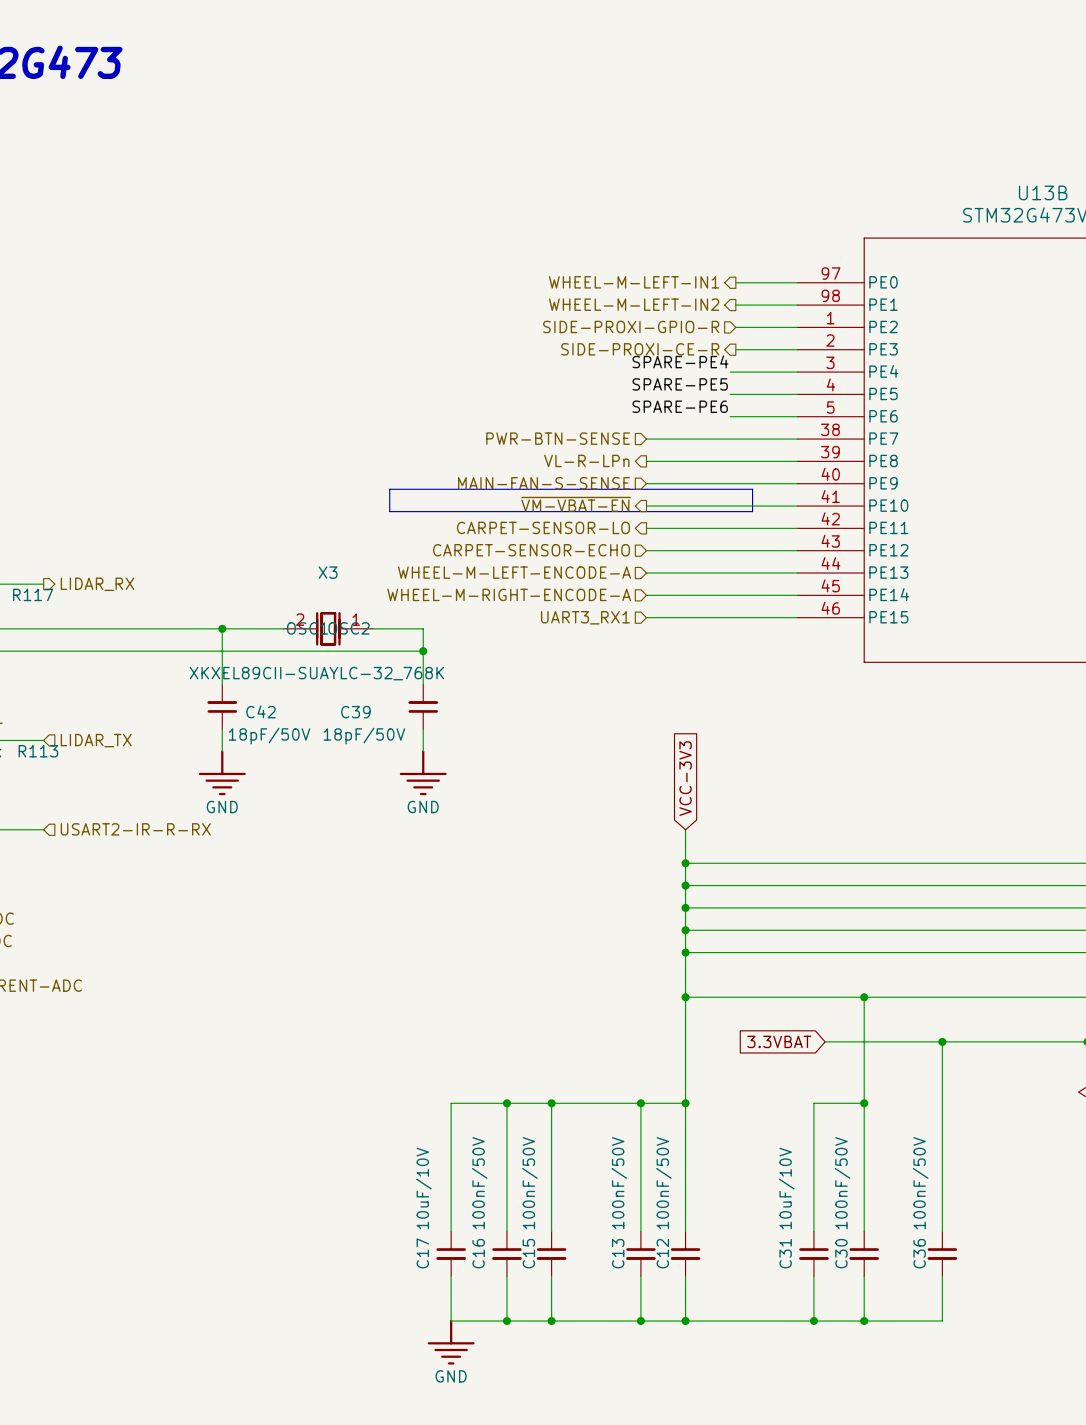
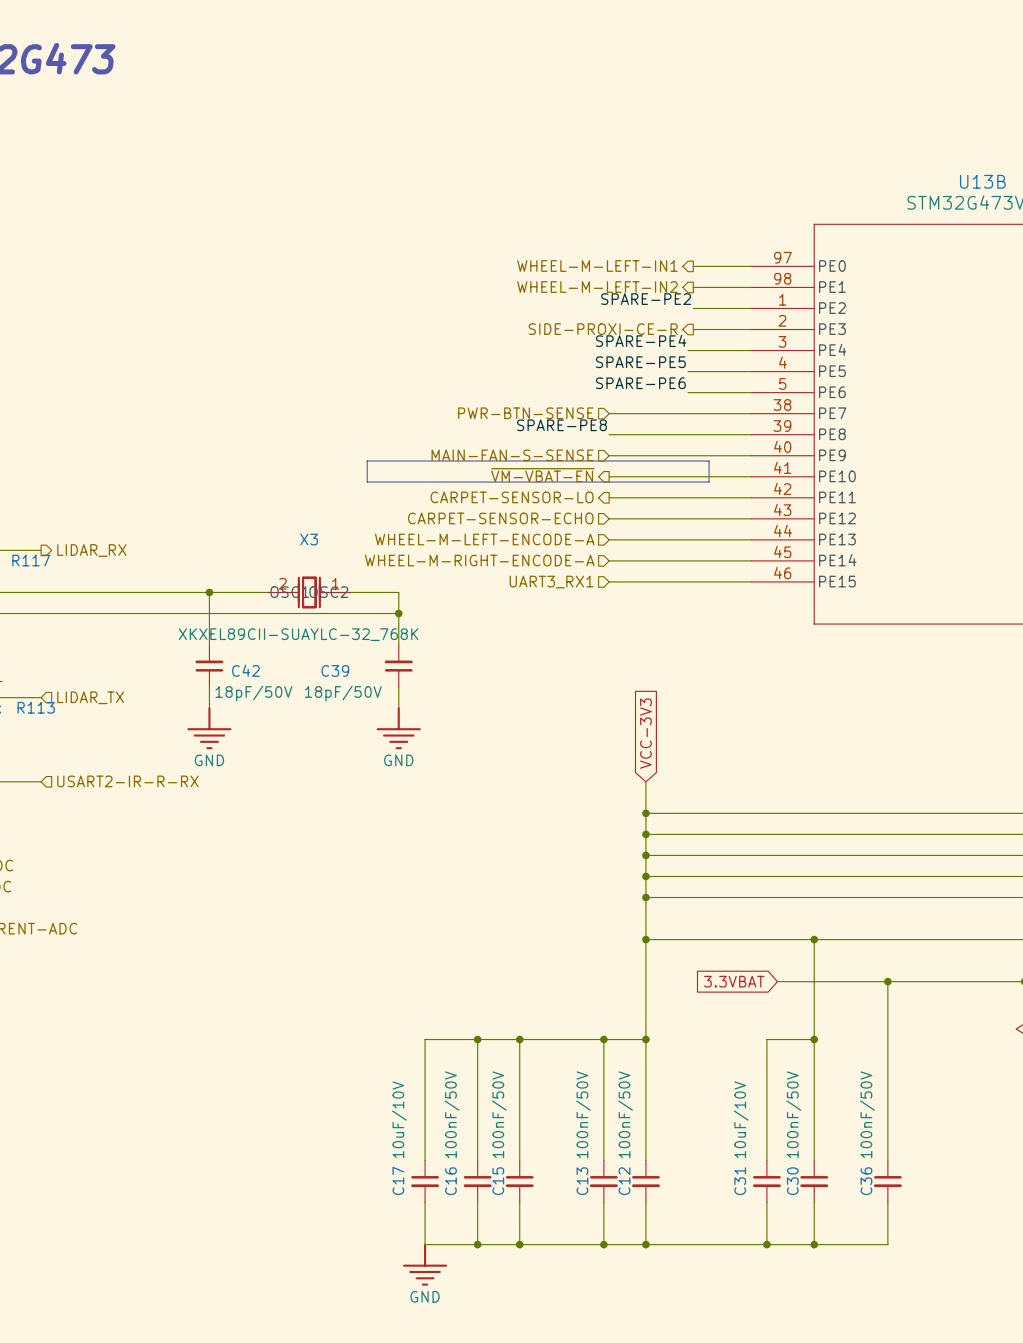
label: none -> SPARE-PE2 (646, 299)
hierarchical label: SIDE-PROXI-GPIO-R (631, 326) -> none
label: none -> SPARE-PE8 (561, 425)
hierarchical label: VL-R-LPn (586, 460) -> none

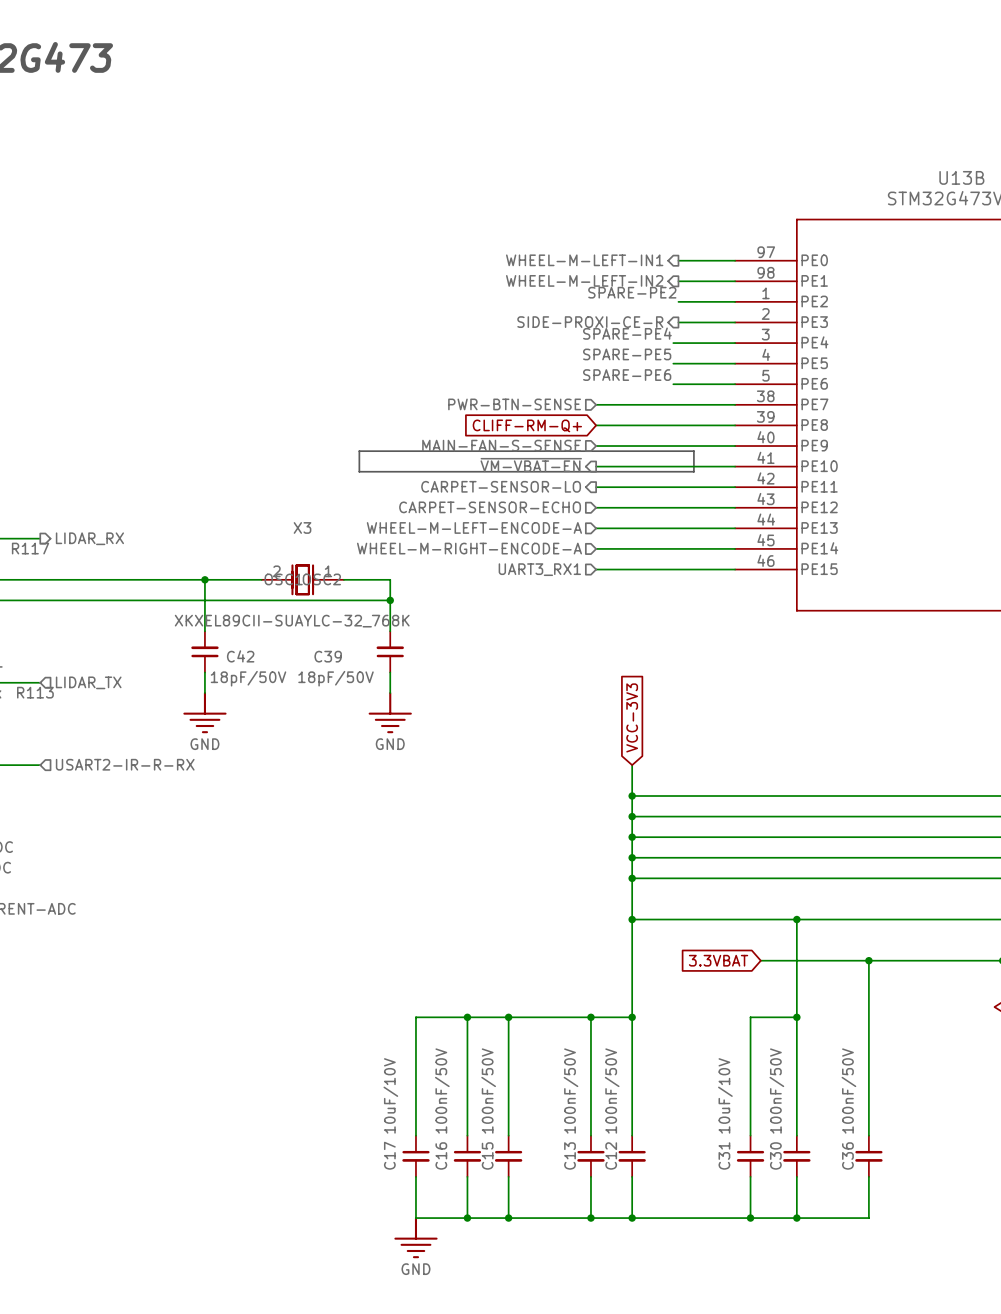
label: SPARE-PE8 (561, 425) -> none
global label: none -> CLIFF-RM-Q+ (527, 425)

